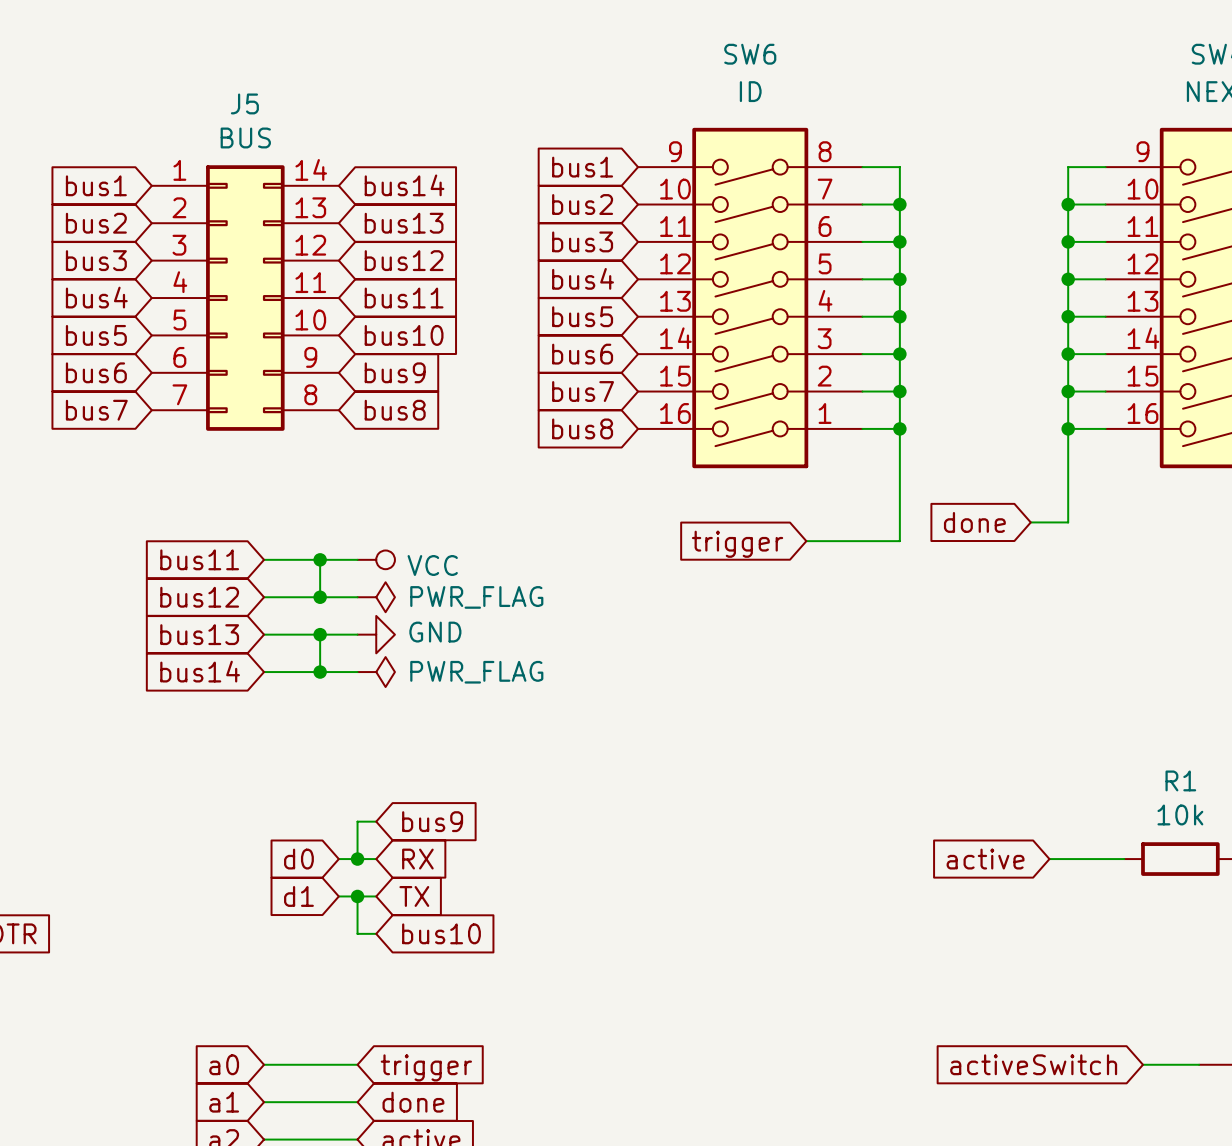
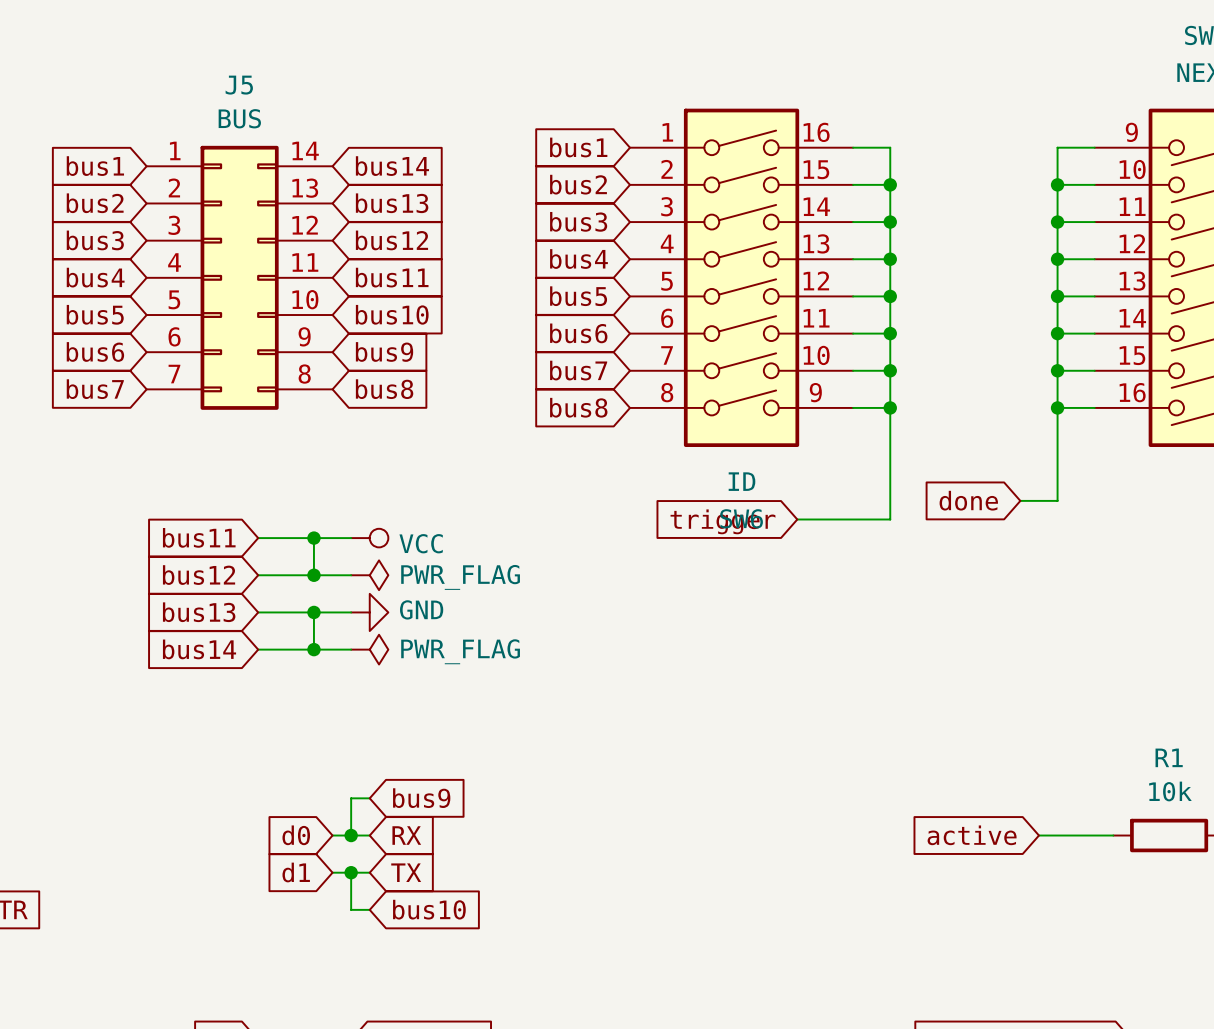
SW6 rotation: 0° (750, 298) -> 180° (741, 277)

